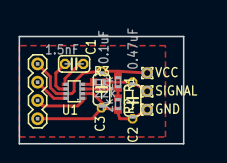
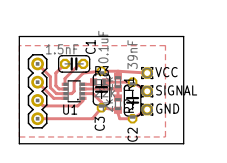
C2 value: 0.47uF (132, 48) -> 39nF (132, 54)

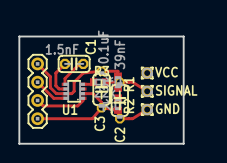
top zone outline: (19, 45) (19, 136) (165, 136) (165, 45) (19, 45) -> none
top track: (117, 71) (147, 73) -> none
top track: (82, 88) (117, 88) (117, 97) -> none
C2 position: (132, 100) -> (119, 100)

